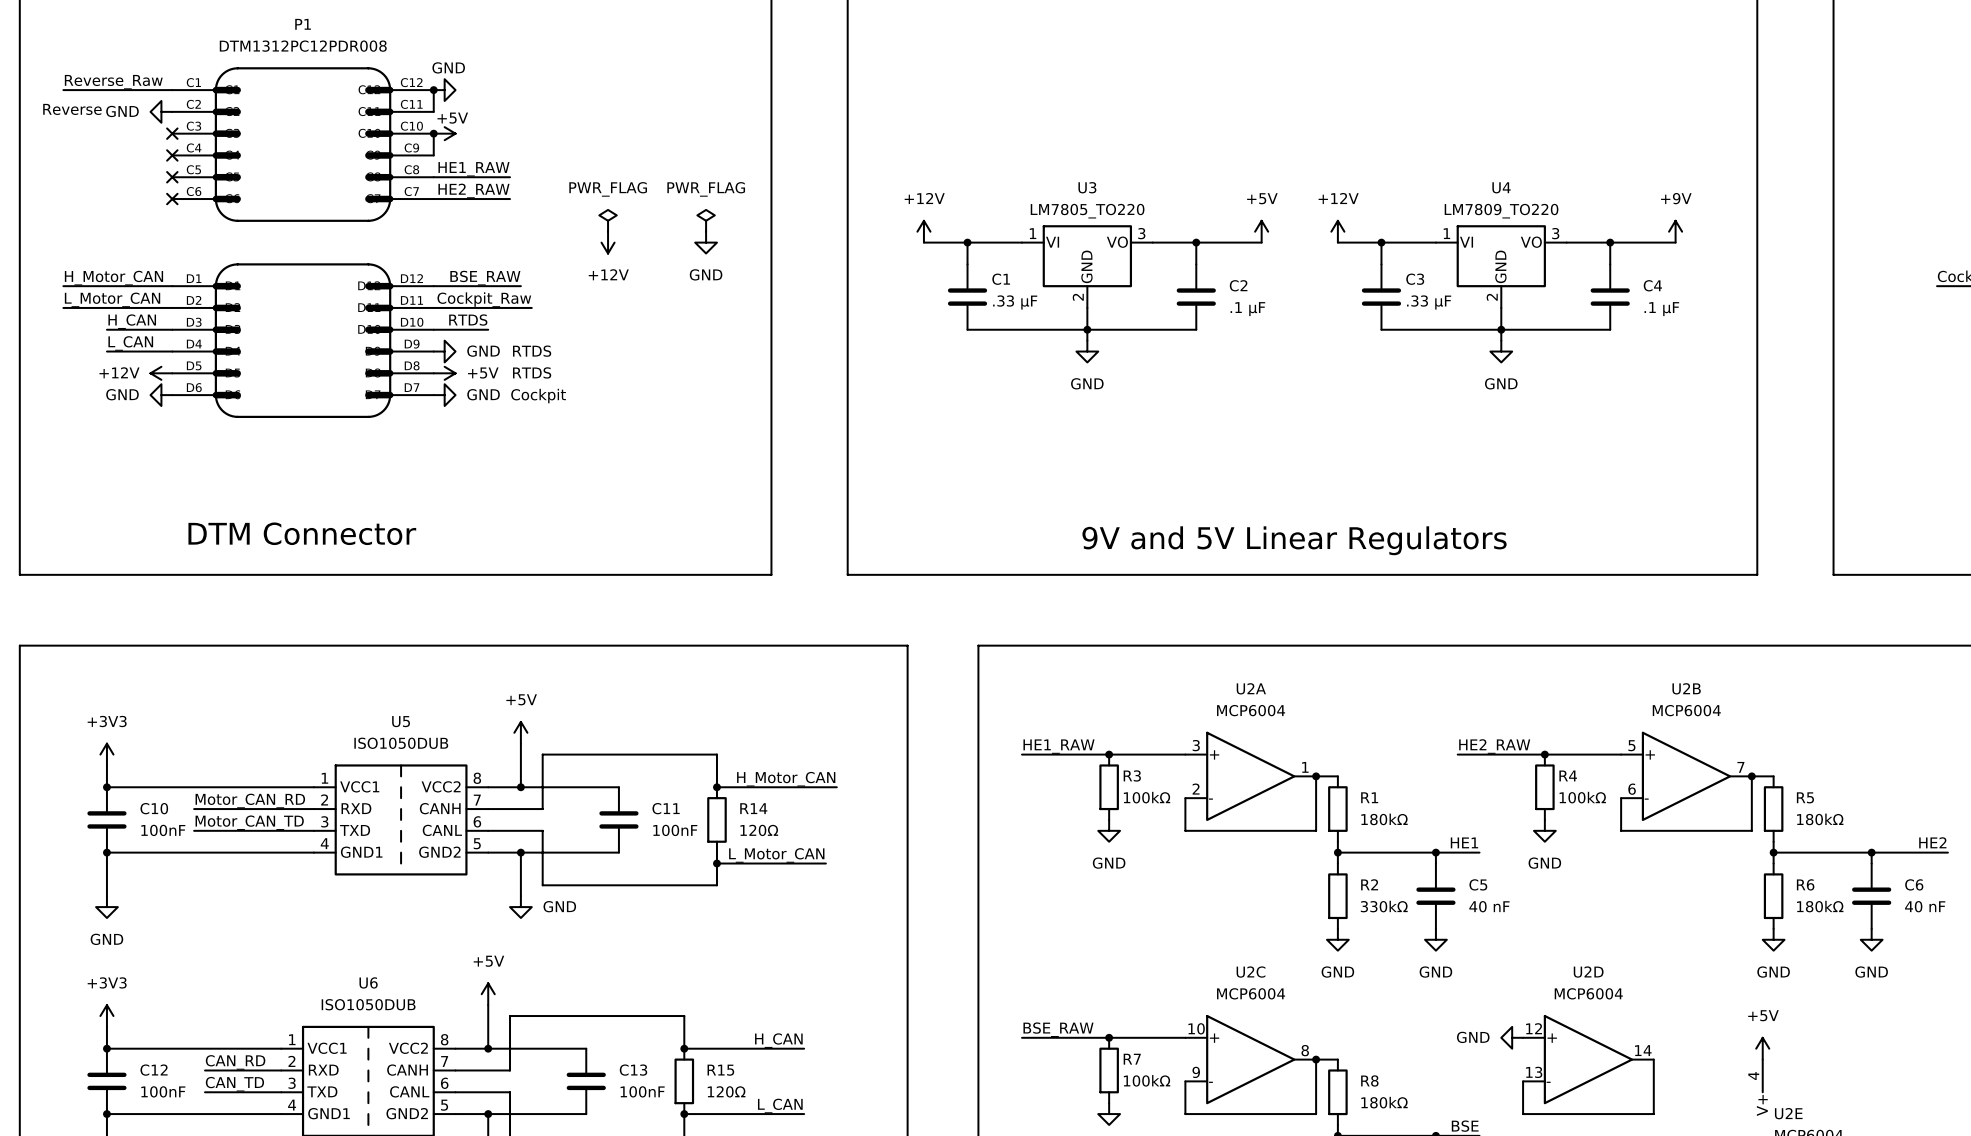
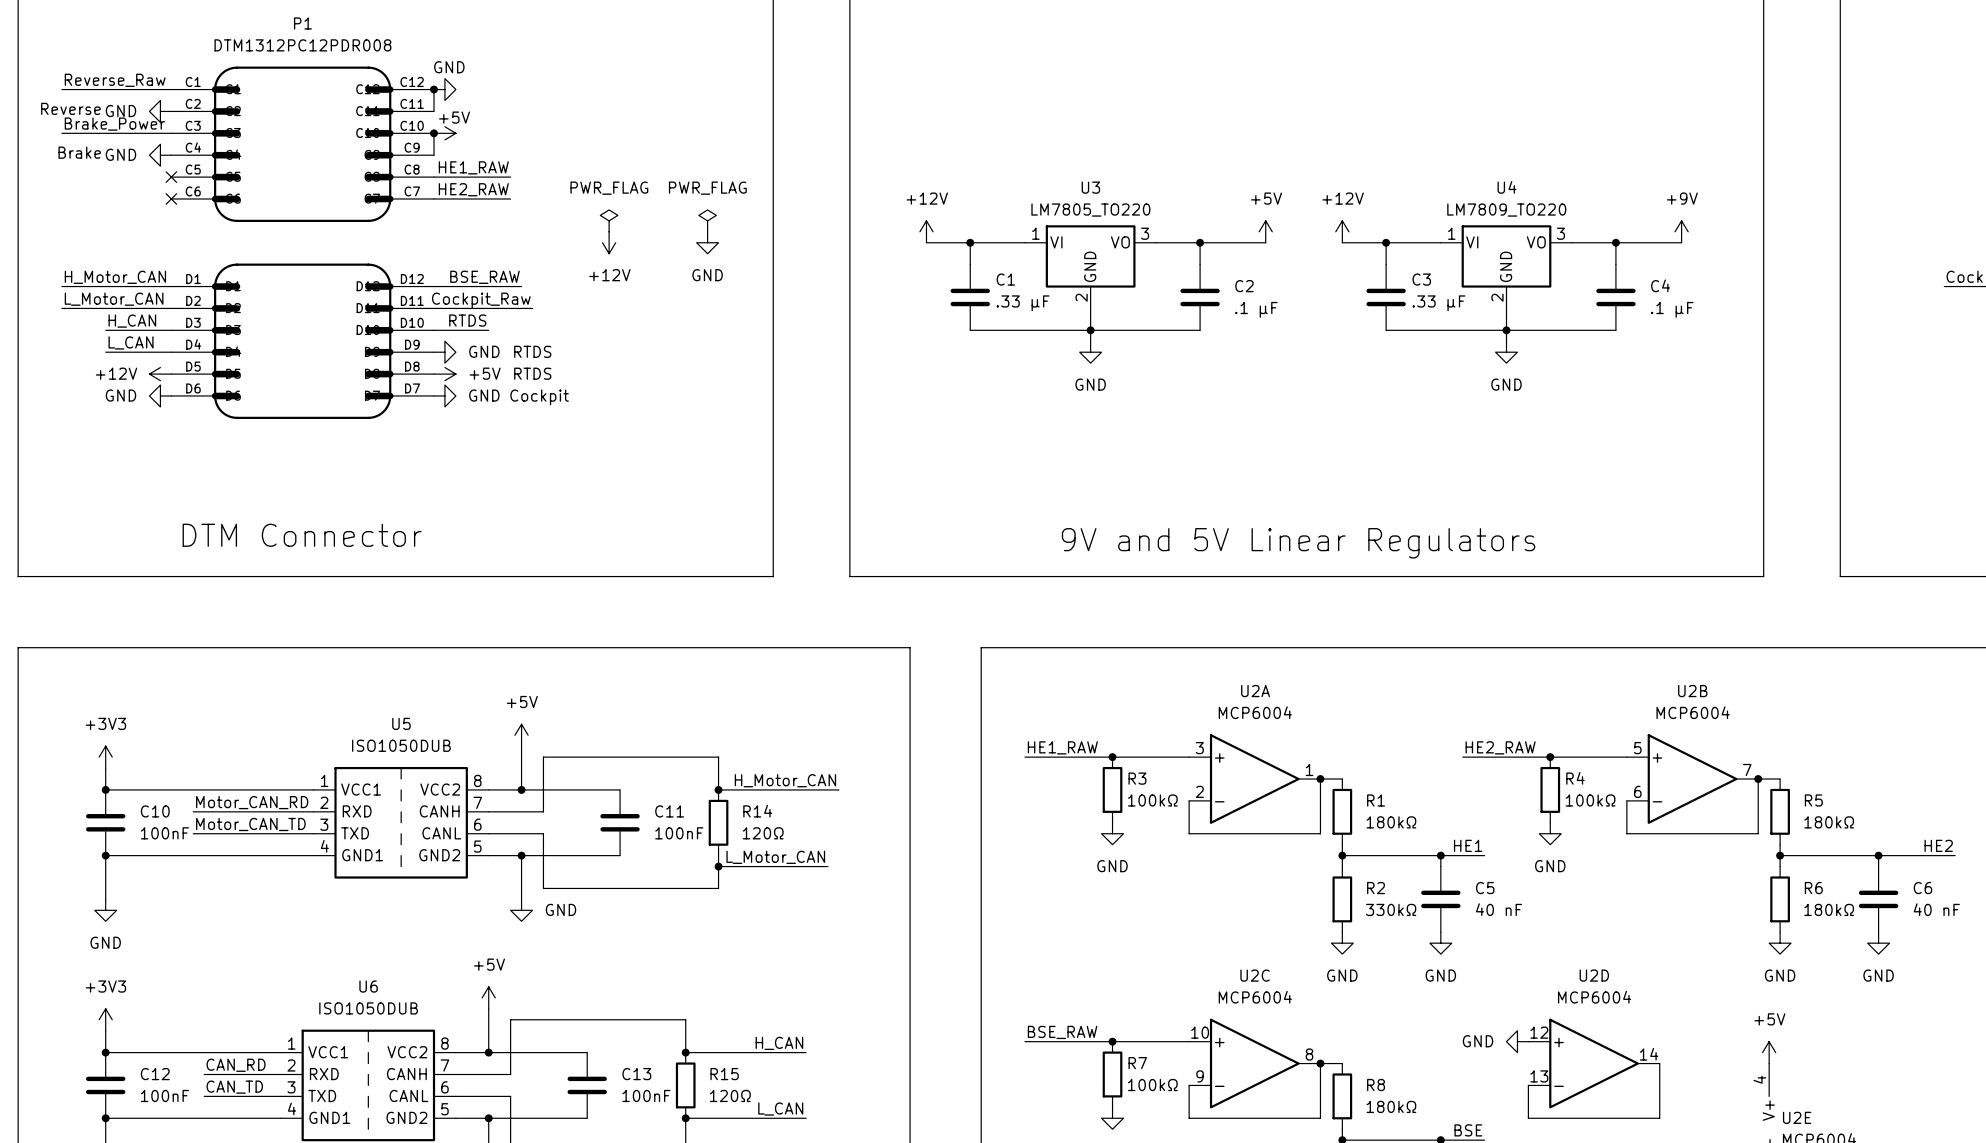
label: none -> Brake_Power (114, 124)
wire: none -> (61, 133) (171, 133)
no-connect mark: (172, 133) -> none
text: none -> Brake (79, 152)
power symbol: none -> GND (160, 155)
no-connect mark: (172, 155) -> none

